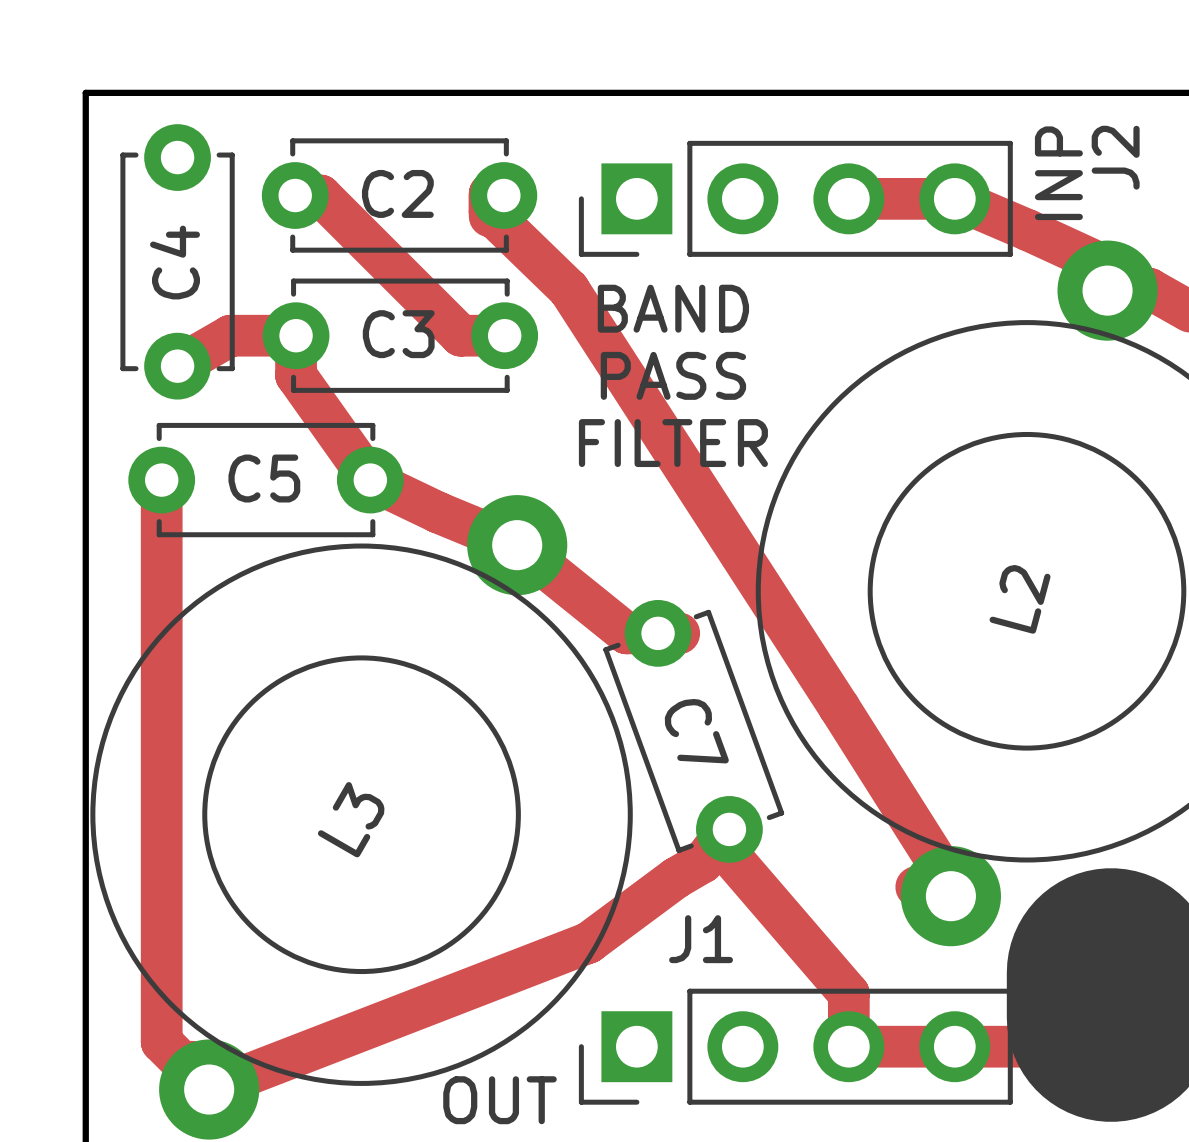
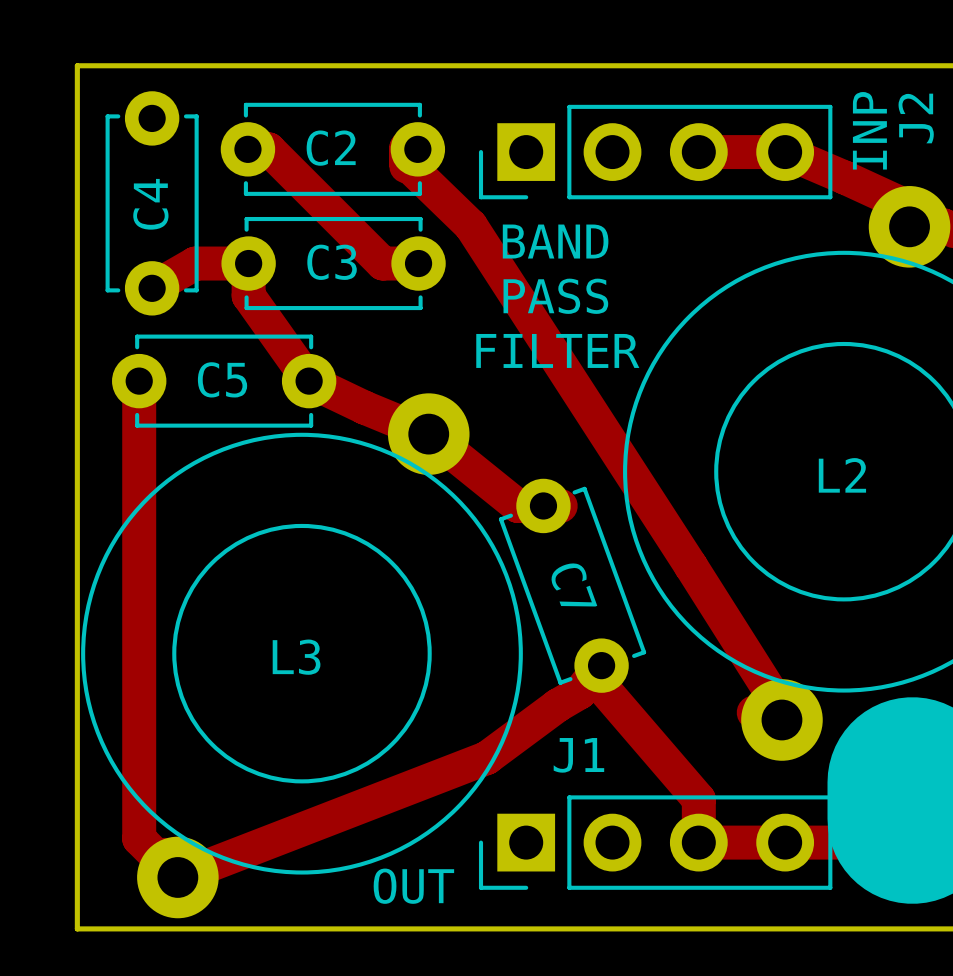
text: none -> L2 (842, 475)
L2 name: L2 (1020, 599) -> none
text: none -> L3 (296, 657)
L3 name: L3 (351, 819) -> none

